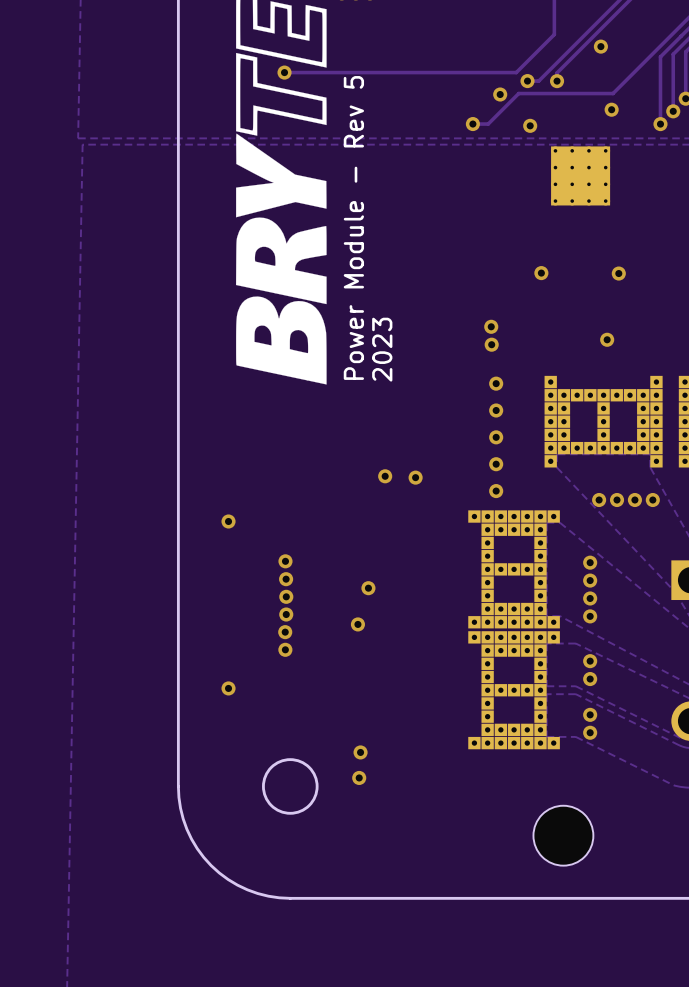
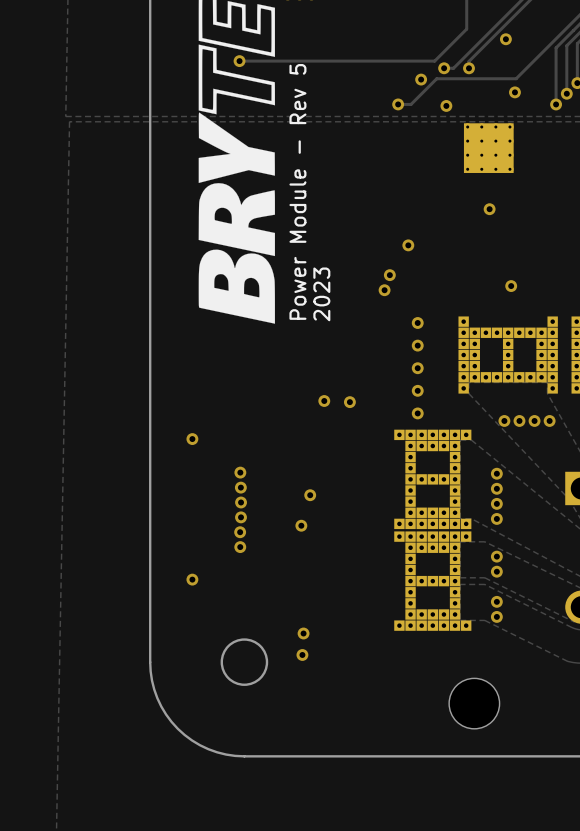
via: none -> (489, 209)
via: (541, 273) -> none
via: (618, 273) -> none
via: none -> (408, 245)
via: none -> (389, 275)
via: (491, 326) -> none
via: none -> (384, 290)
via: (491, 344) -> none

